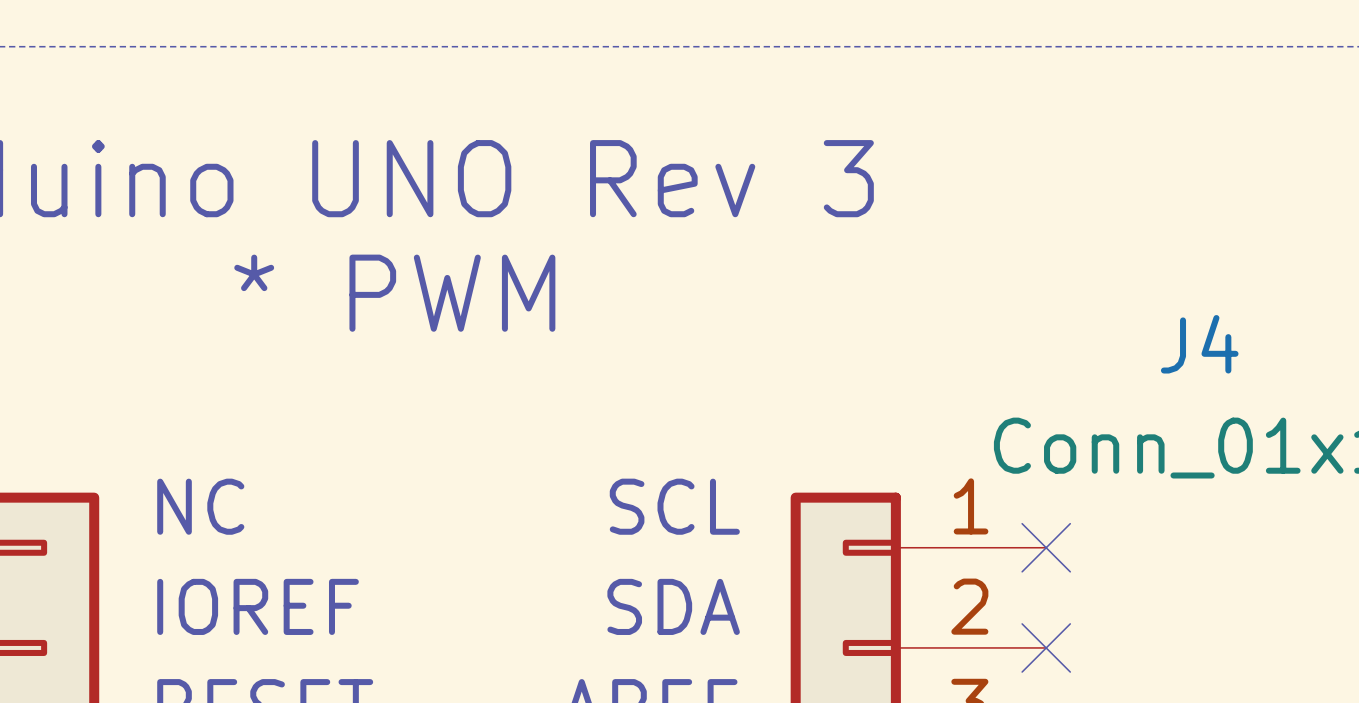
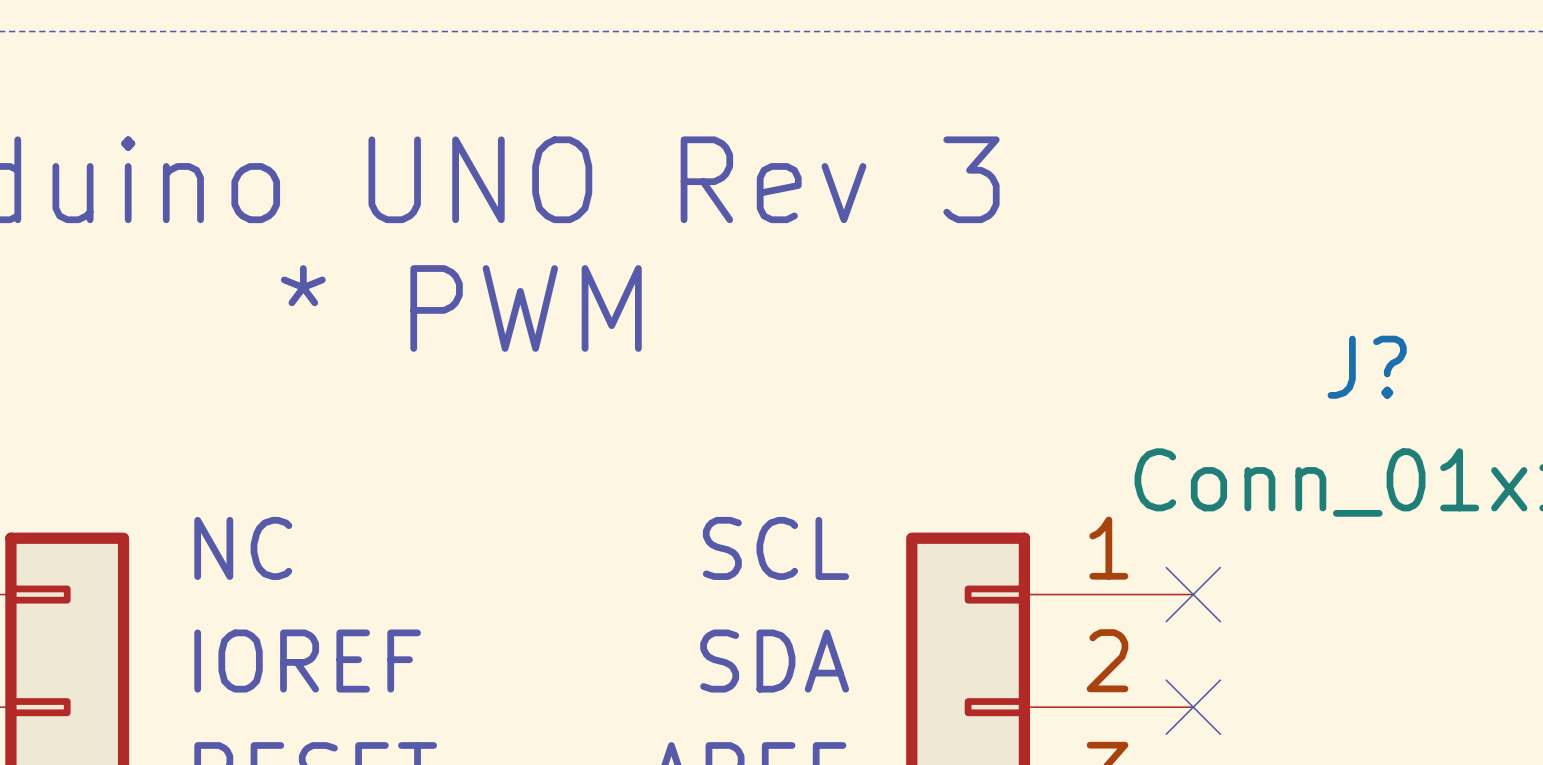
J4 name: J4 (1199, 344) -> J? (1367, 367)

